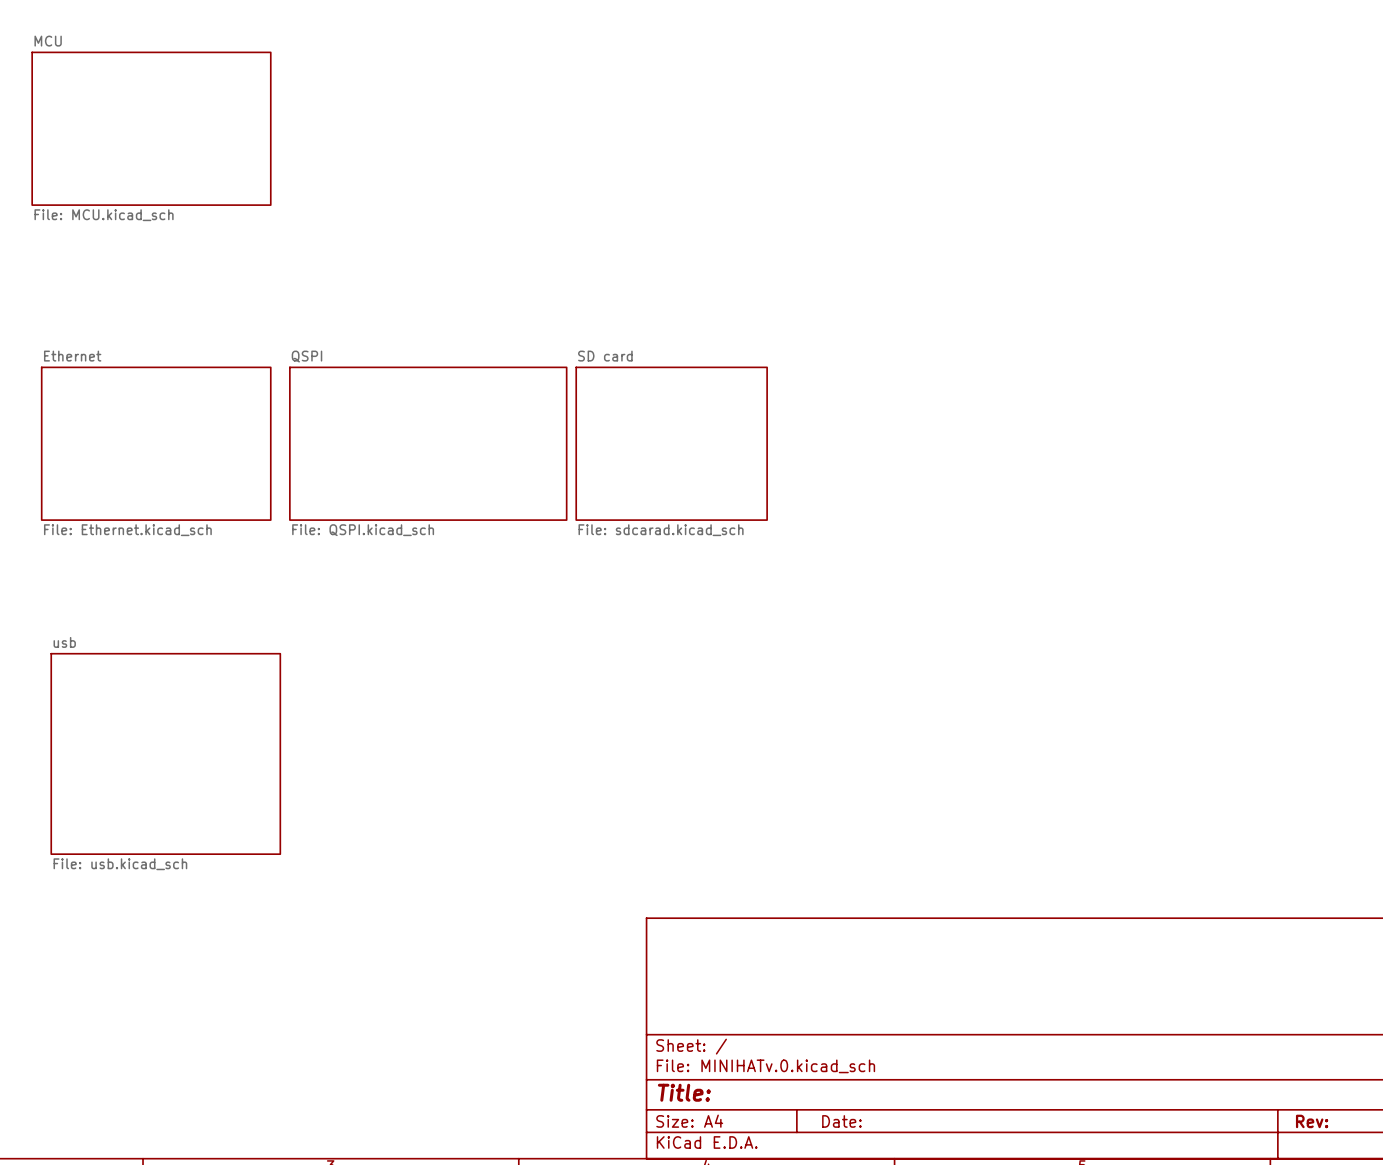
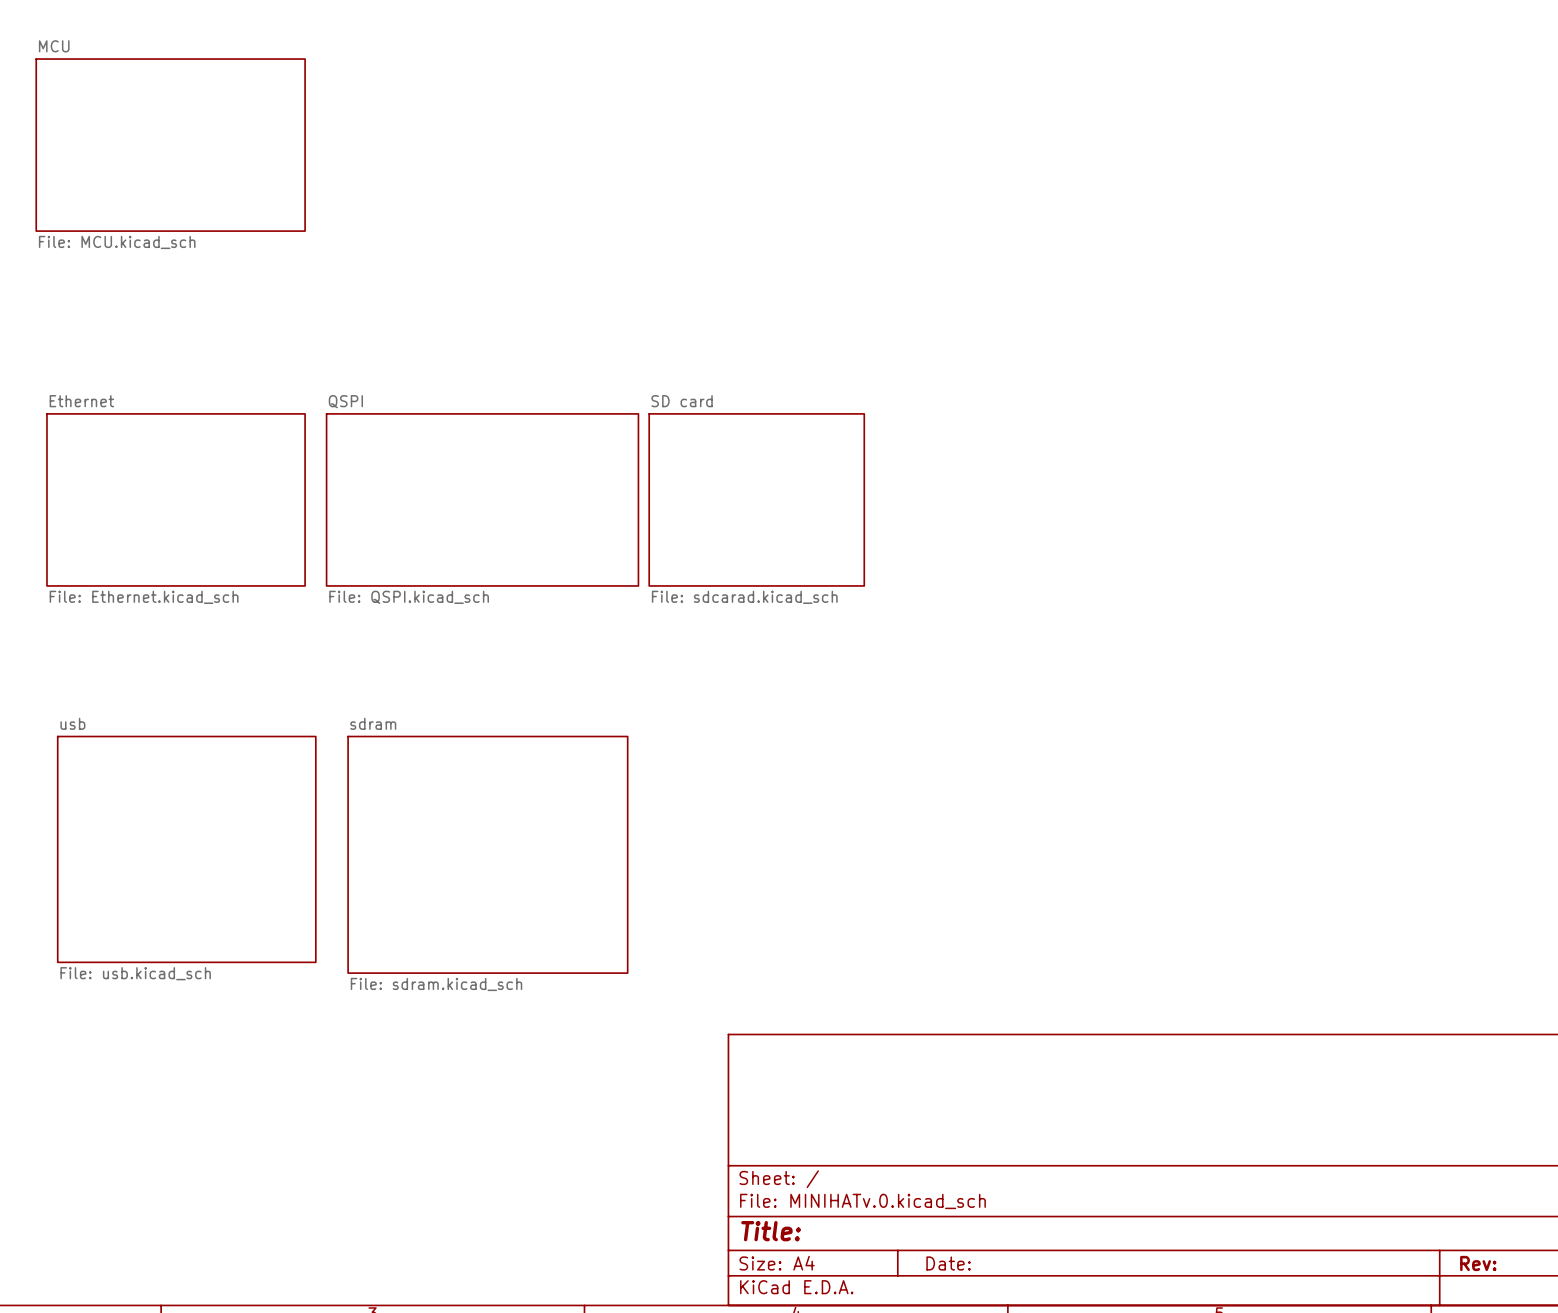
sheet sdram: none -> File: sdram.kicad_sch (487, 854)

